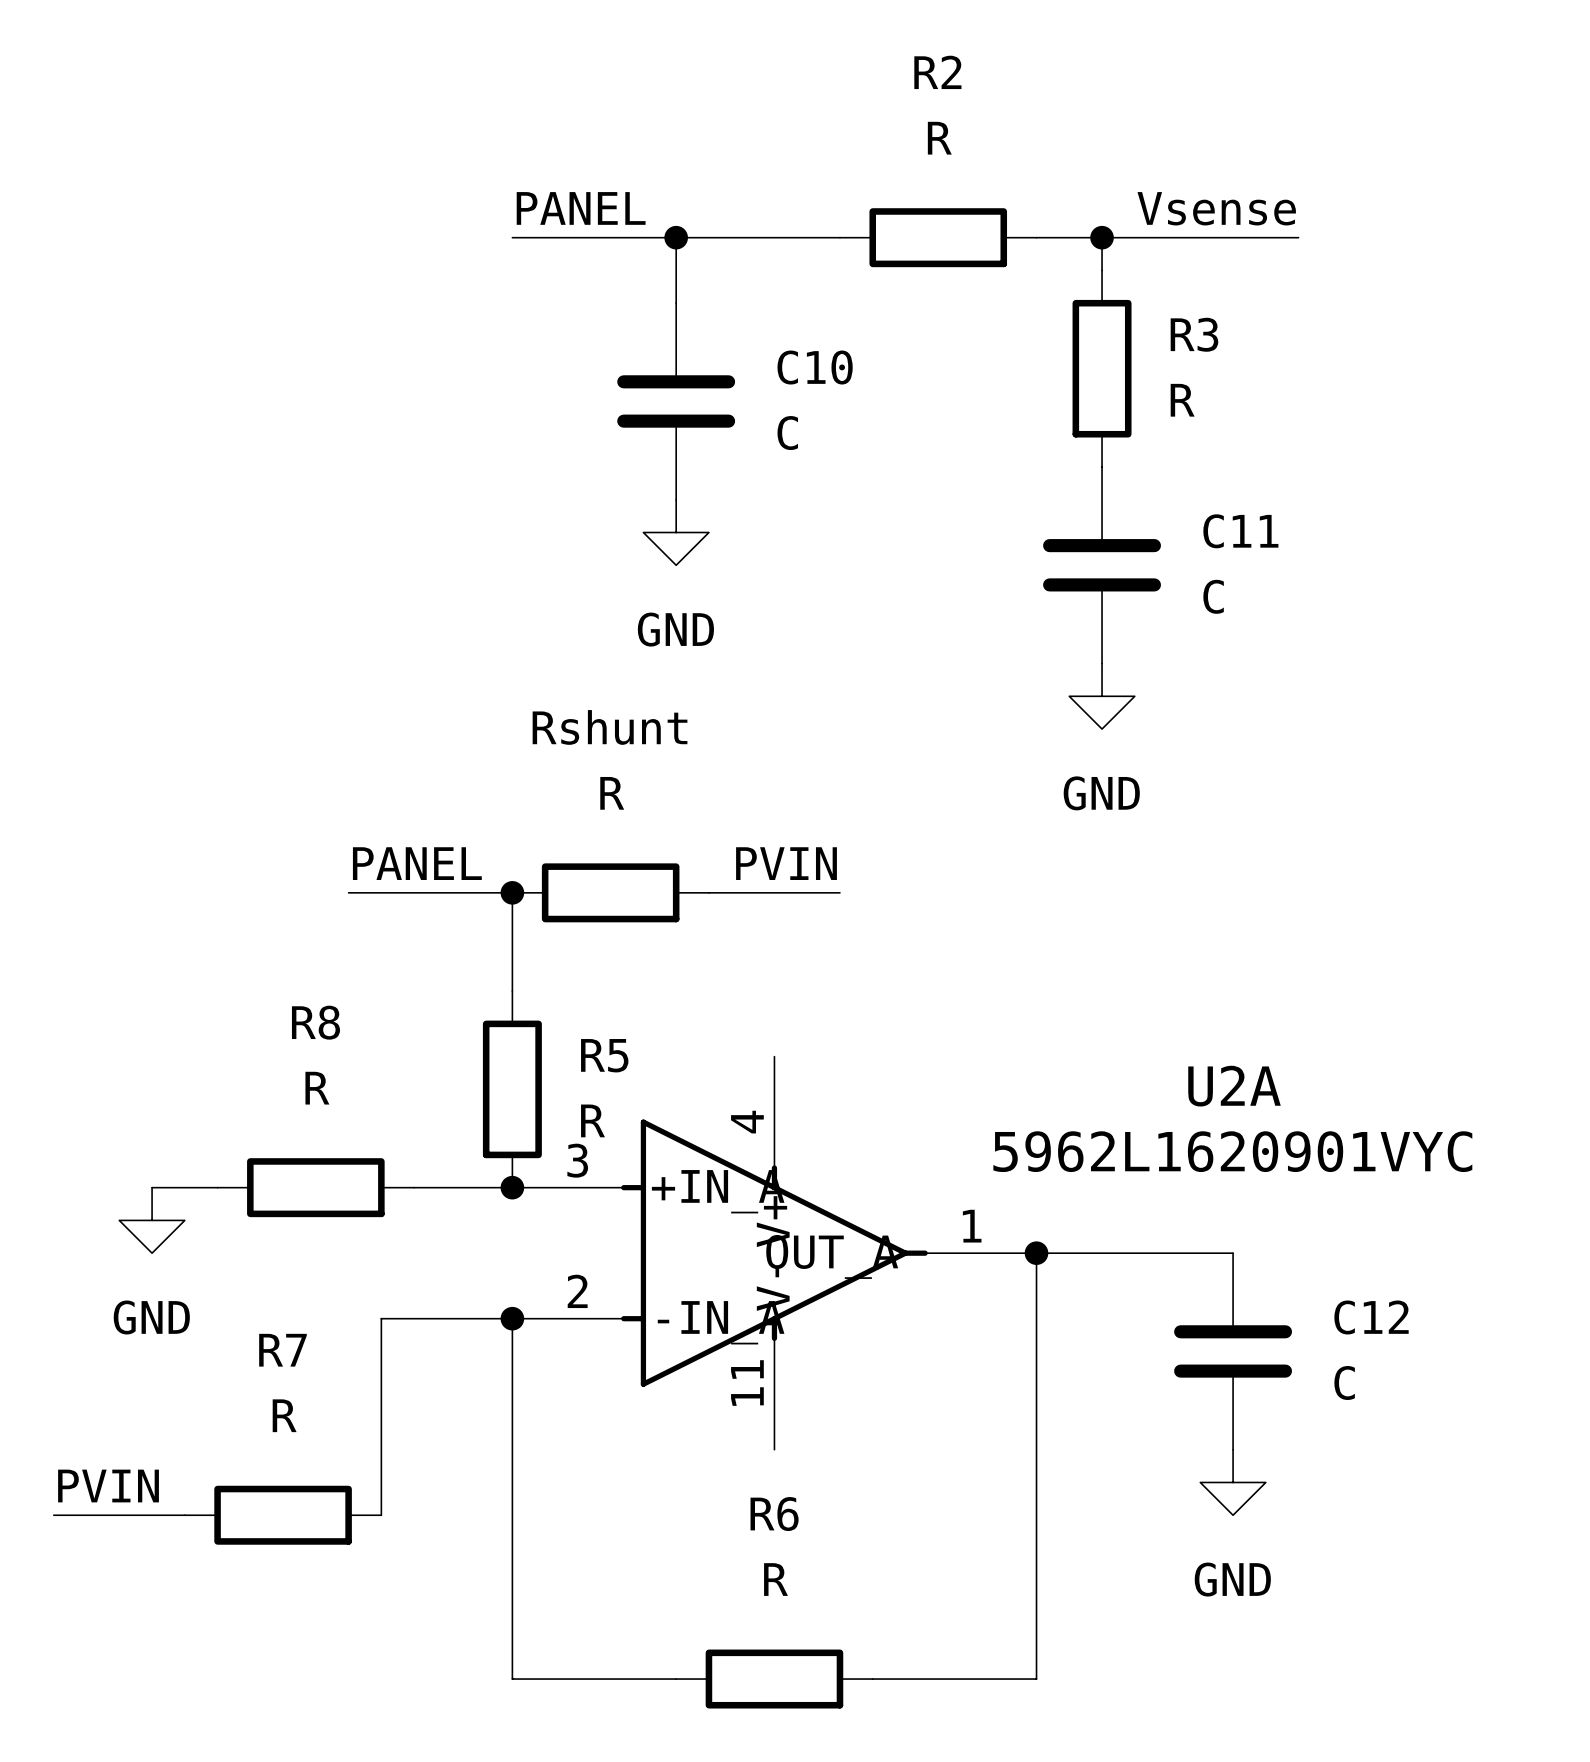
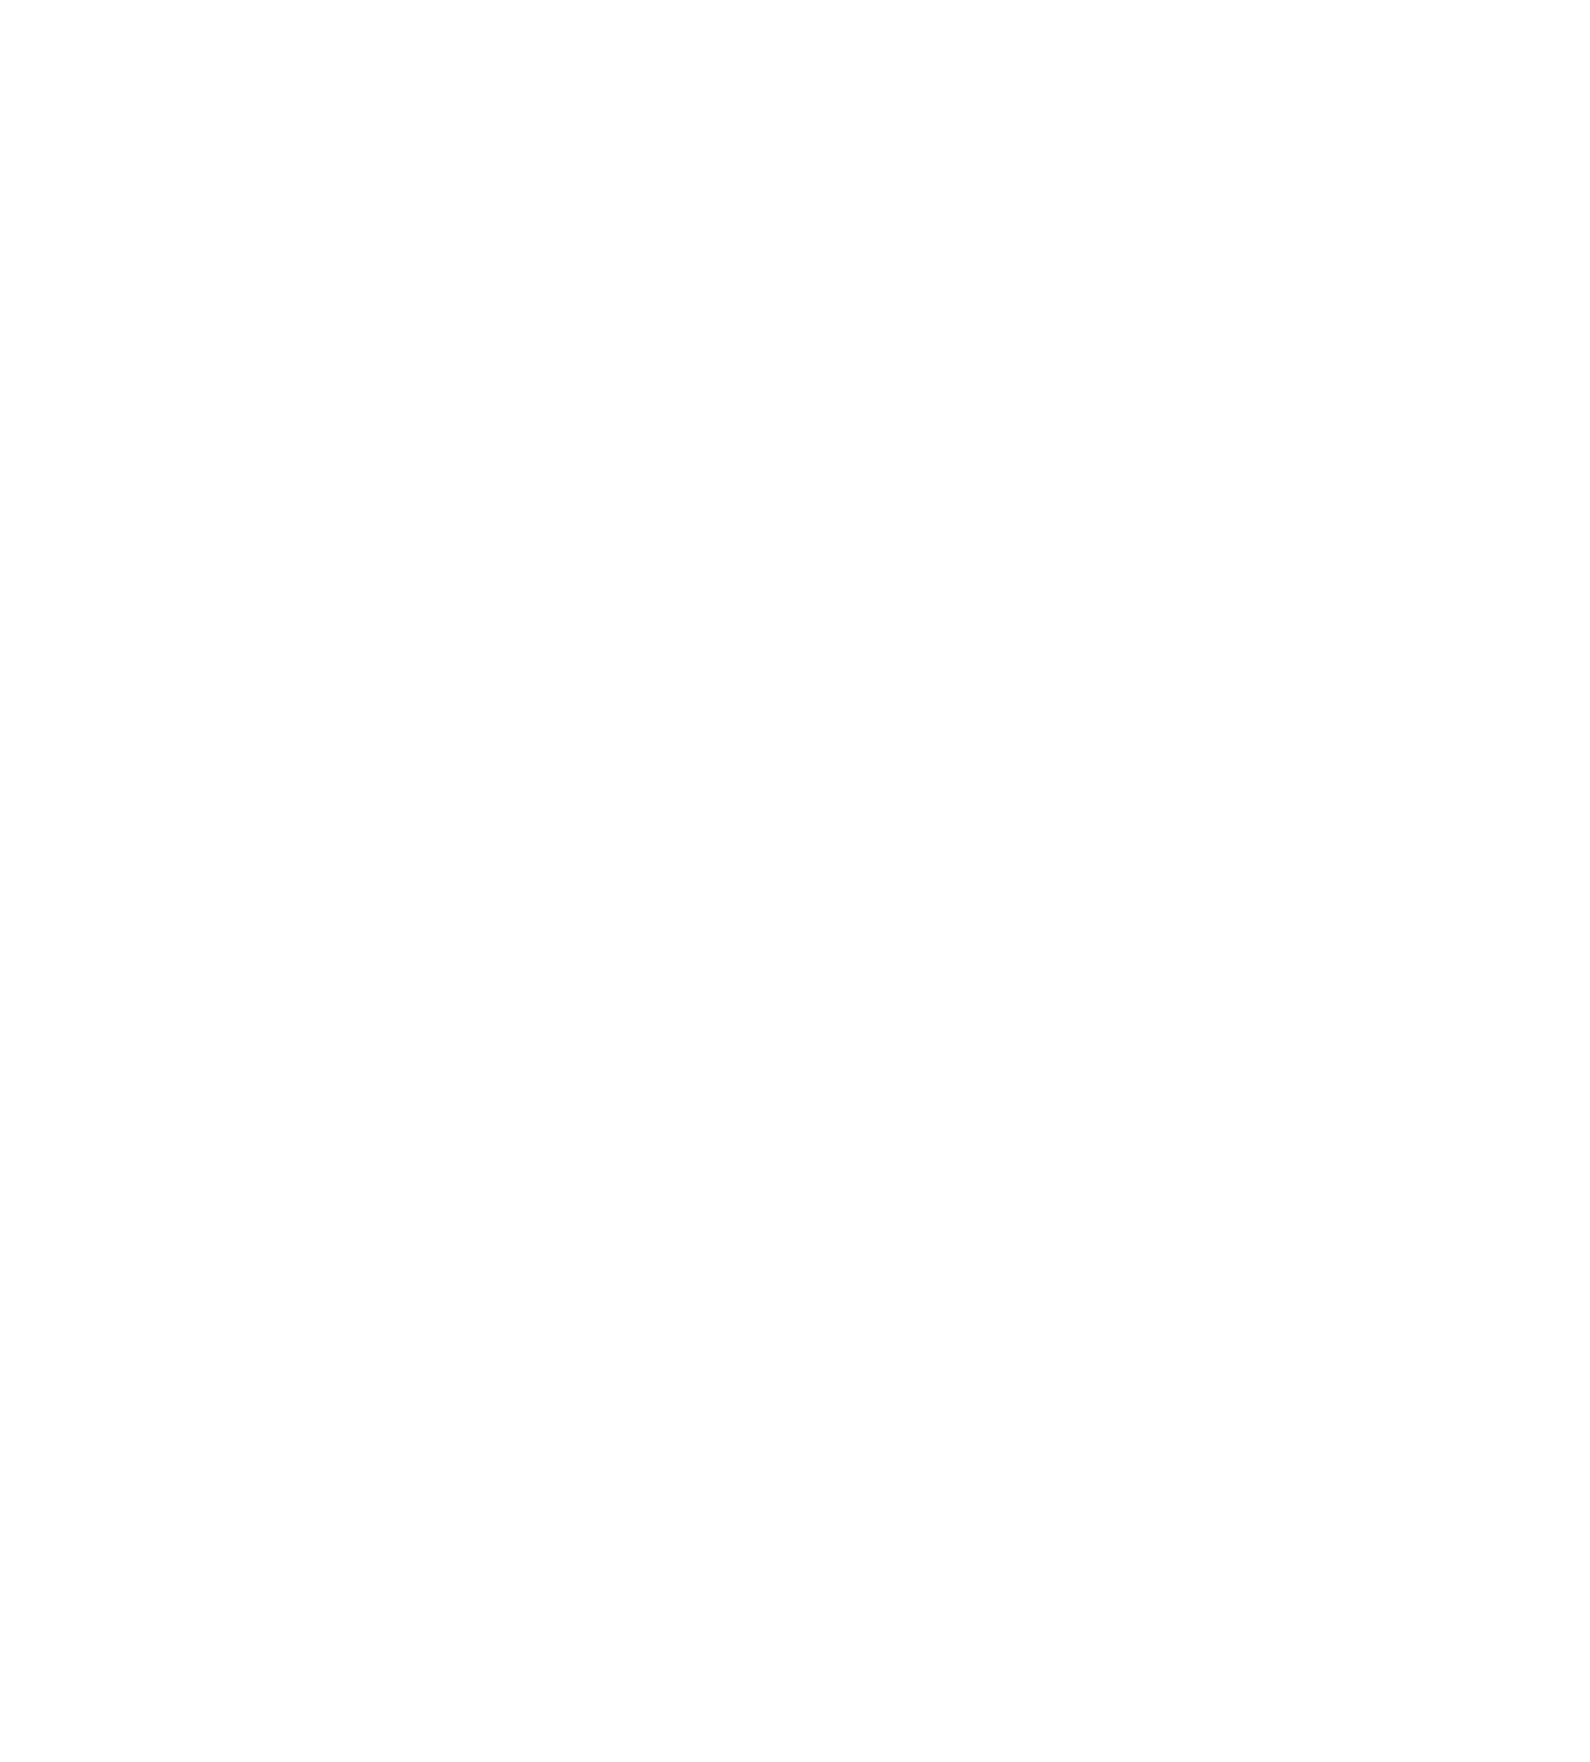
label: PANEL (581, 208) -> none
label: Vsense (1216, 208) -> none
wire: (512, 237) (839, 237) -> none
wire: (676, 237) (676, 303) -> none
junction: (676, 237) -> none
R2: R (938, 237) -> none
wire: (1036, 237) (1298, 237) -> none
wire: (1102, 237) (1102, 270) -> none
junction: (1102, 237) -> none
R3: R (1102, 368) -> none
C10: C (676, 401) -> none
power symbol: GND (676, 532) -> none
C11: C (1102, 565) -> none
power symbol: GND (1102, 696) -> none
label: PANEL (417, 863) -> none
label: PVIN (786, 863) -> none
wire: (348, 892) (512, 892) (512, 991) -> none
junction: (512, 892) -> none
Rshunt: R (610, 892) -> none
wire: (708, 892) (839, 892) -> none
R5: R (512, 1089) -> none
wire: (152, 1187) (217, 1187) -> none
R8: R (315, 1187) -> none
wire: (414, 1187) (512, 1187) -> none
junction: (512, 1187) -> none
power symbol: GND (152, 1220) -> none
U2A: 5962L1620901VYC (774, 1253) -> none
junction: (1036, 1253) -> none
wire: (1233, 1253) (1036, 1253) (1036, 1679) (872, 1679) -> none
junction: (512, 1318) -> none
C12: C (1233, 1351) -> none
power symbol: GND (1233, 1482) -> none
label: PVIN (108, 1486) -> none
wire: (53, 1515) (184, 1515) -> none
R7: R (283, 1515) -> none
wire: (381, 1515) (381, 1318) (512, 1318) (512, 1679) (676, 1679) -> none
R6: R (774, 1679) -> none

